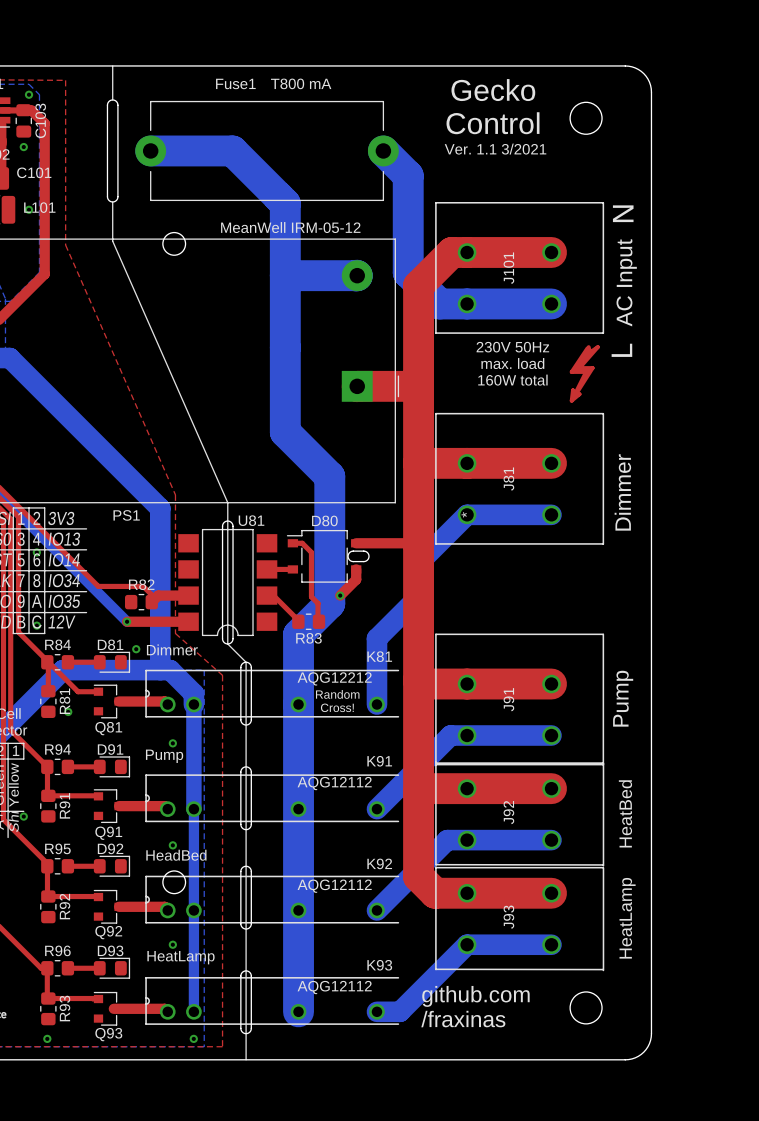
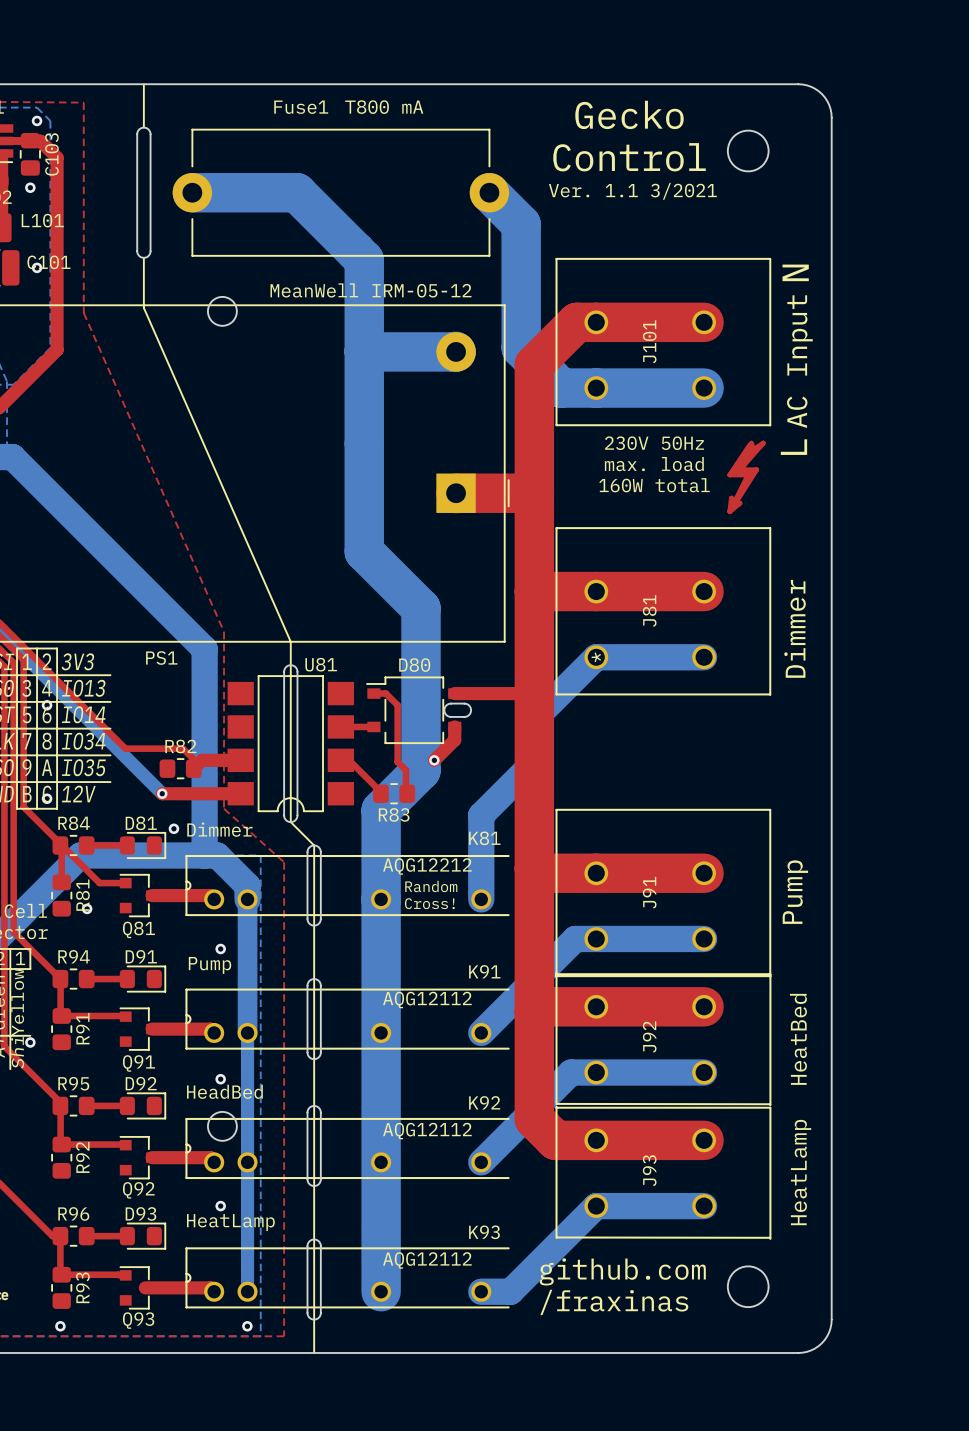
C101 name position: C101 (34, 172) -> C101 (48, 262)
L101 name position: L101 (39, 207) -> L101 (42, 220)

